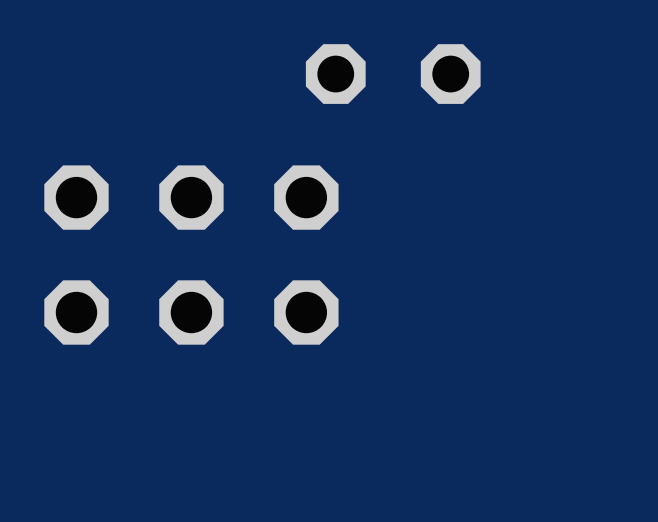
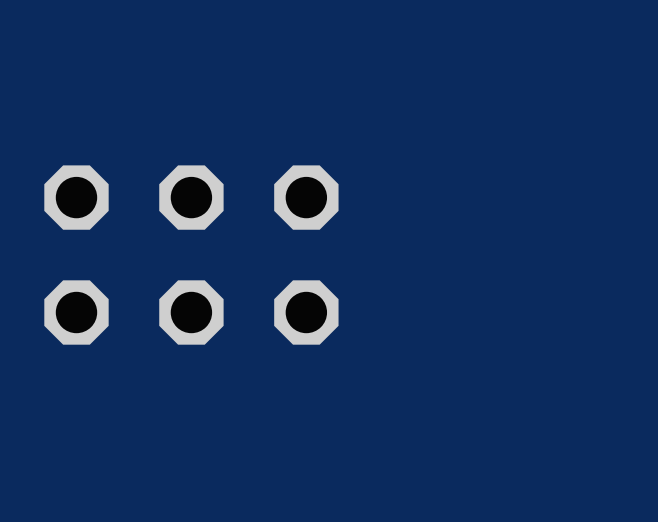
part: (393, 74) -> none

